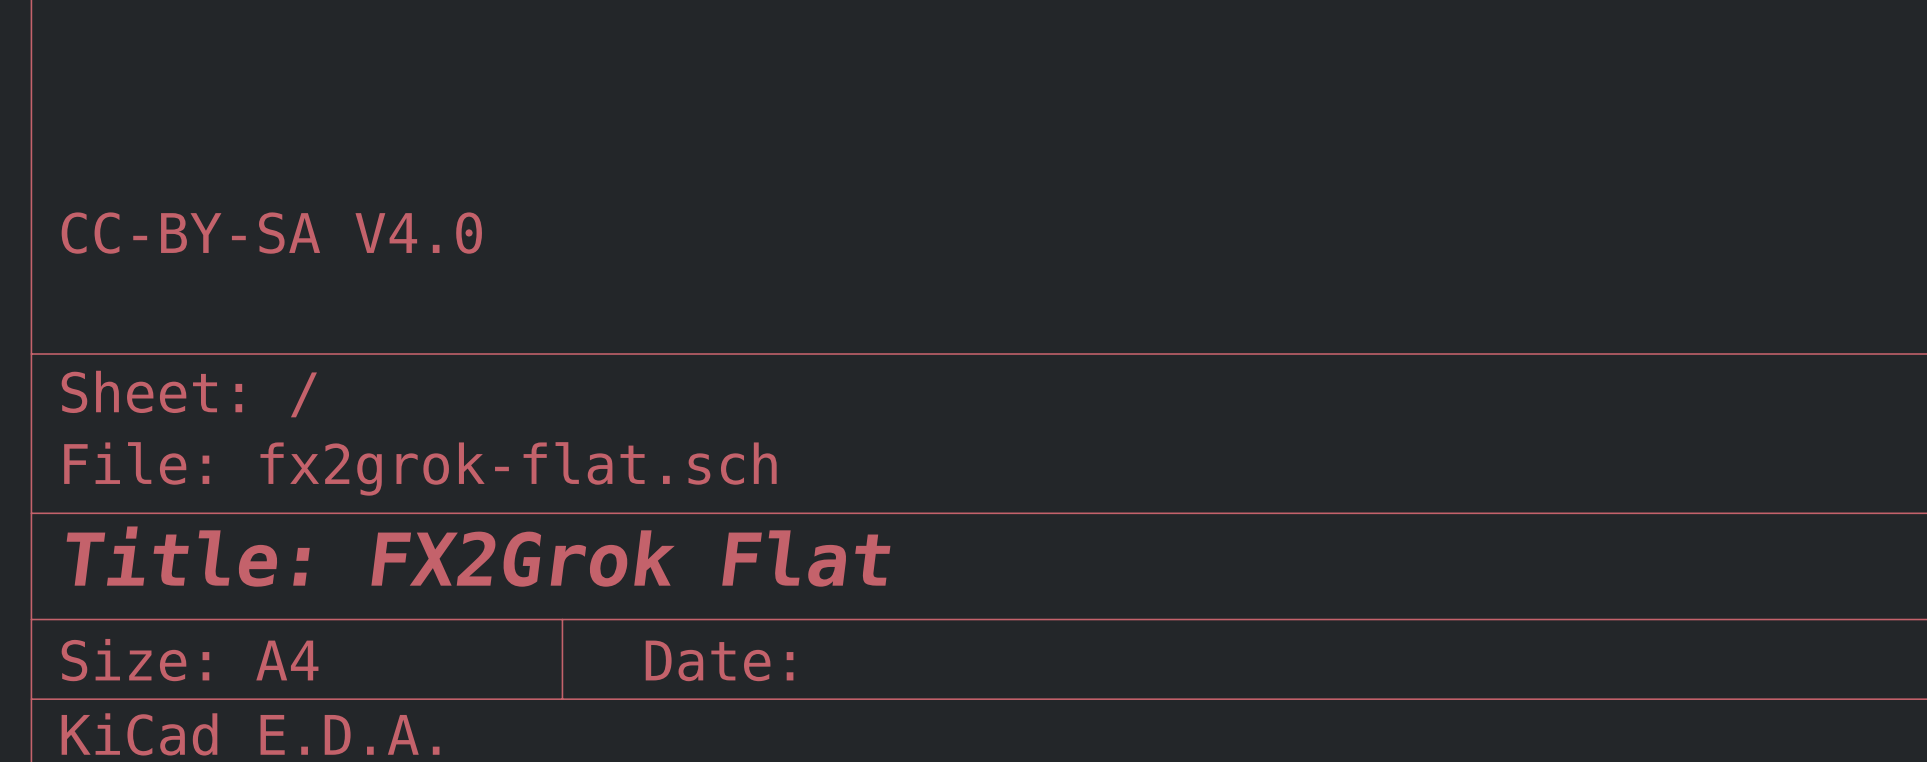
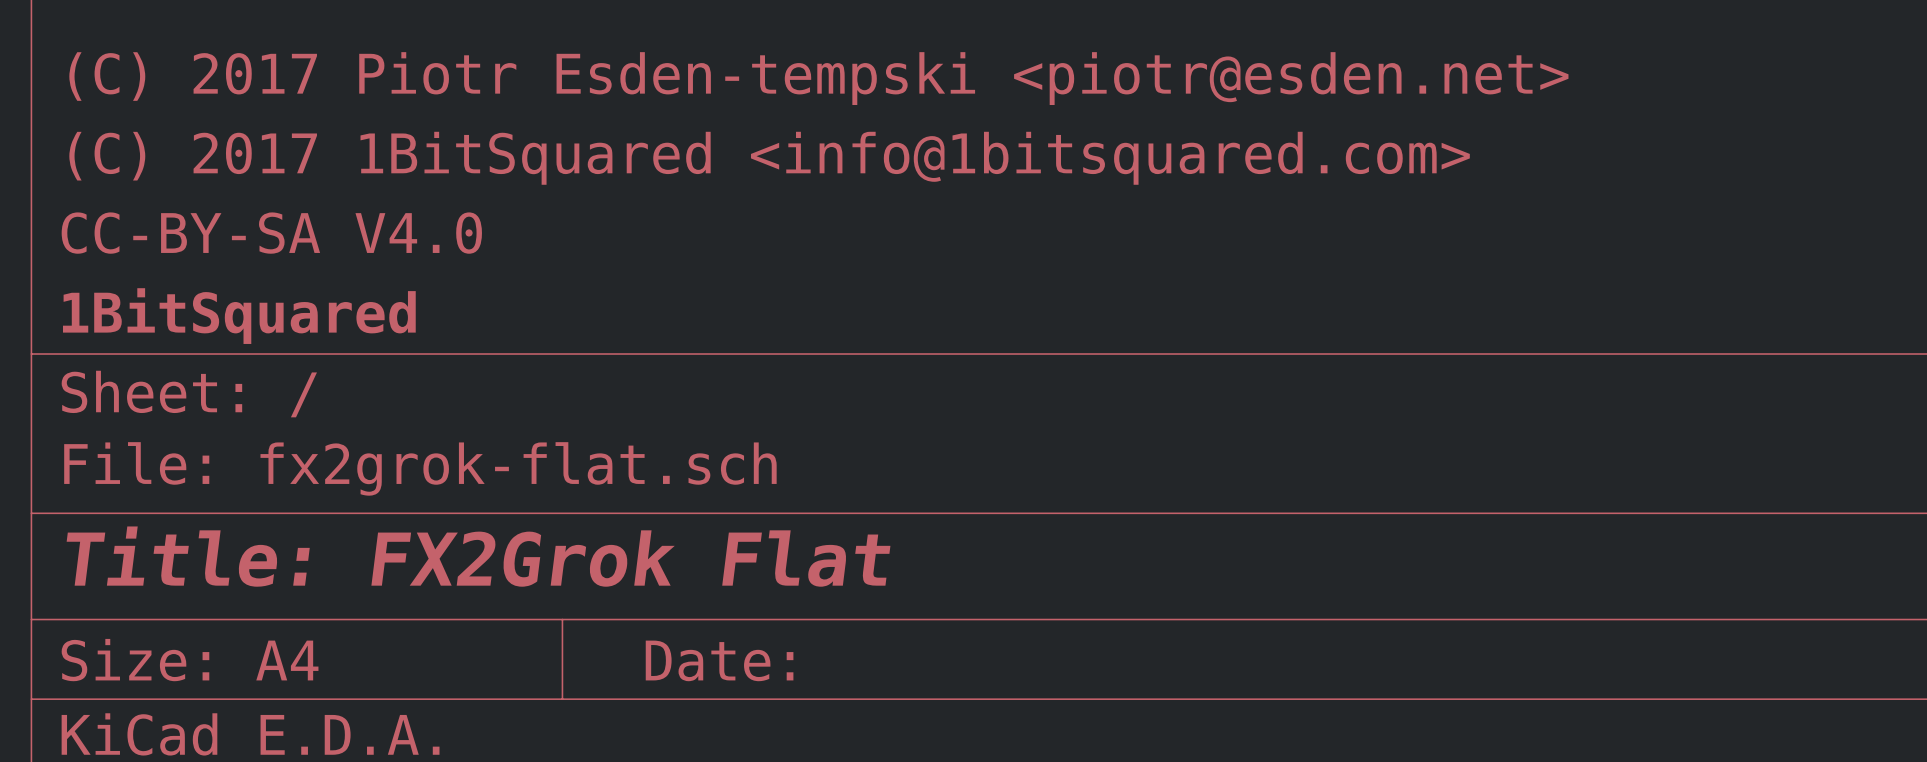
title block: none -> (C) 2017 Piotr Esden-tempski <piotr@esden.net> (818, 78)
title block: none -> (C) 2017 1BitSquared <info@1bitsquared.com> (769, 158)
title block: none -> 1BitSquared (239, 316)

